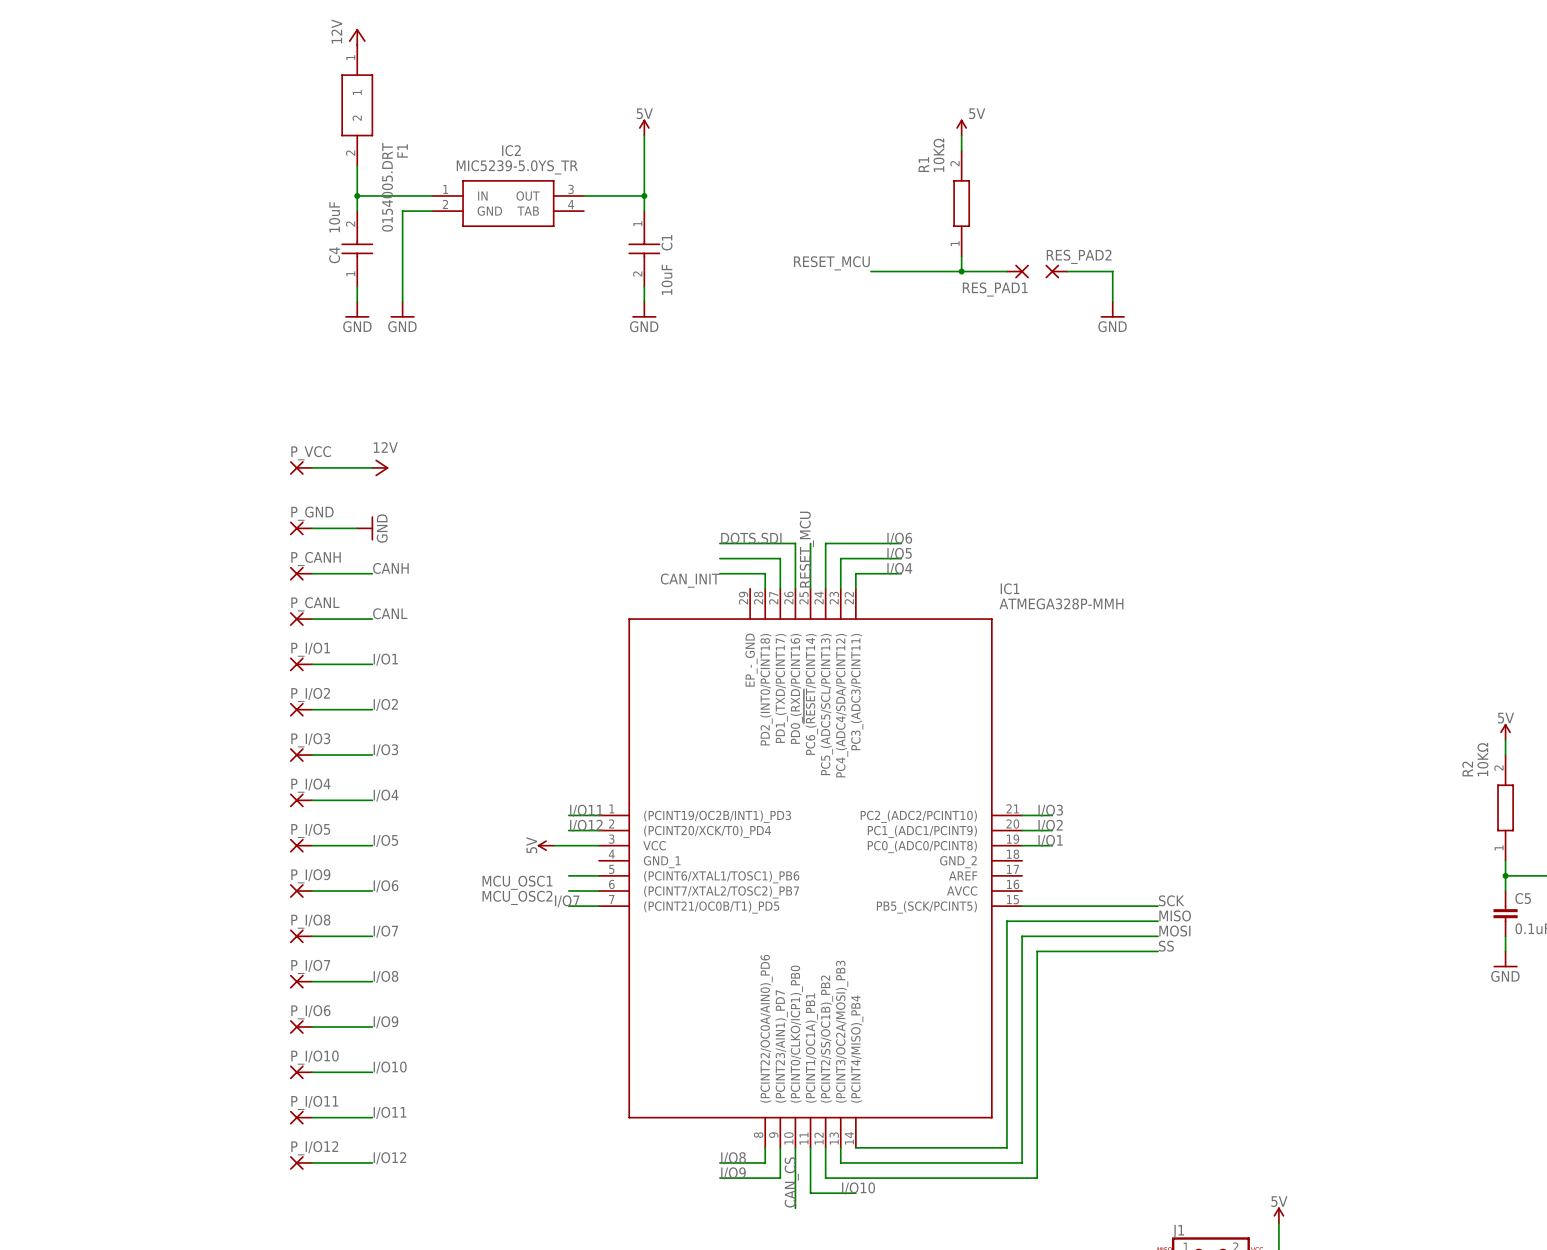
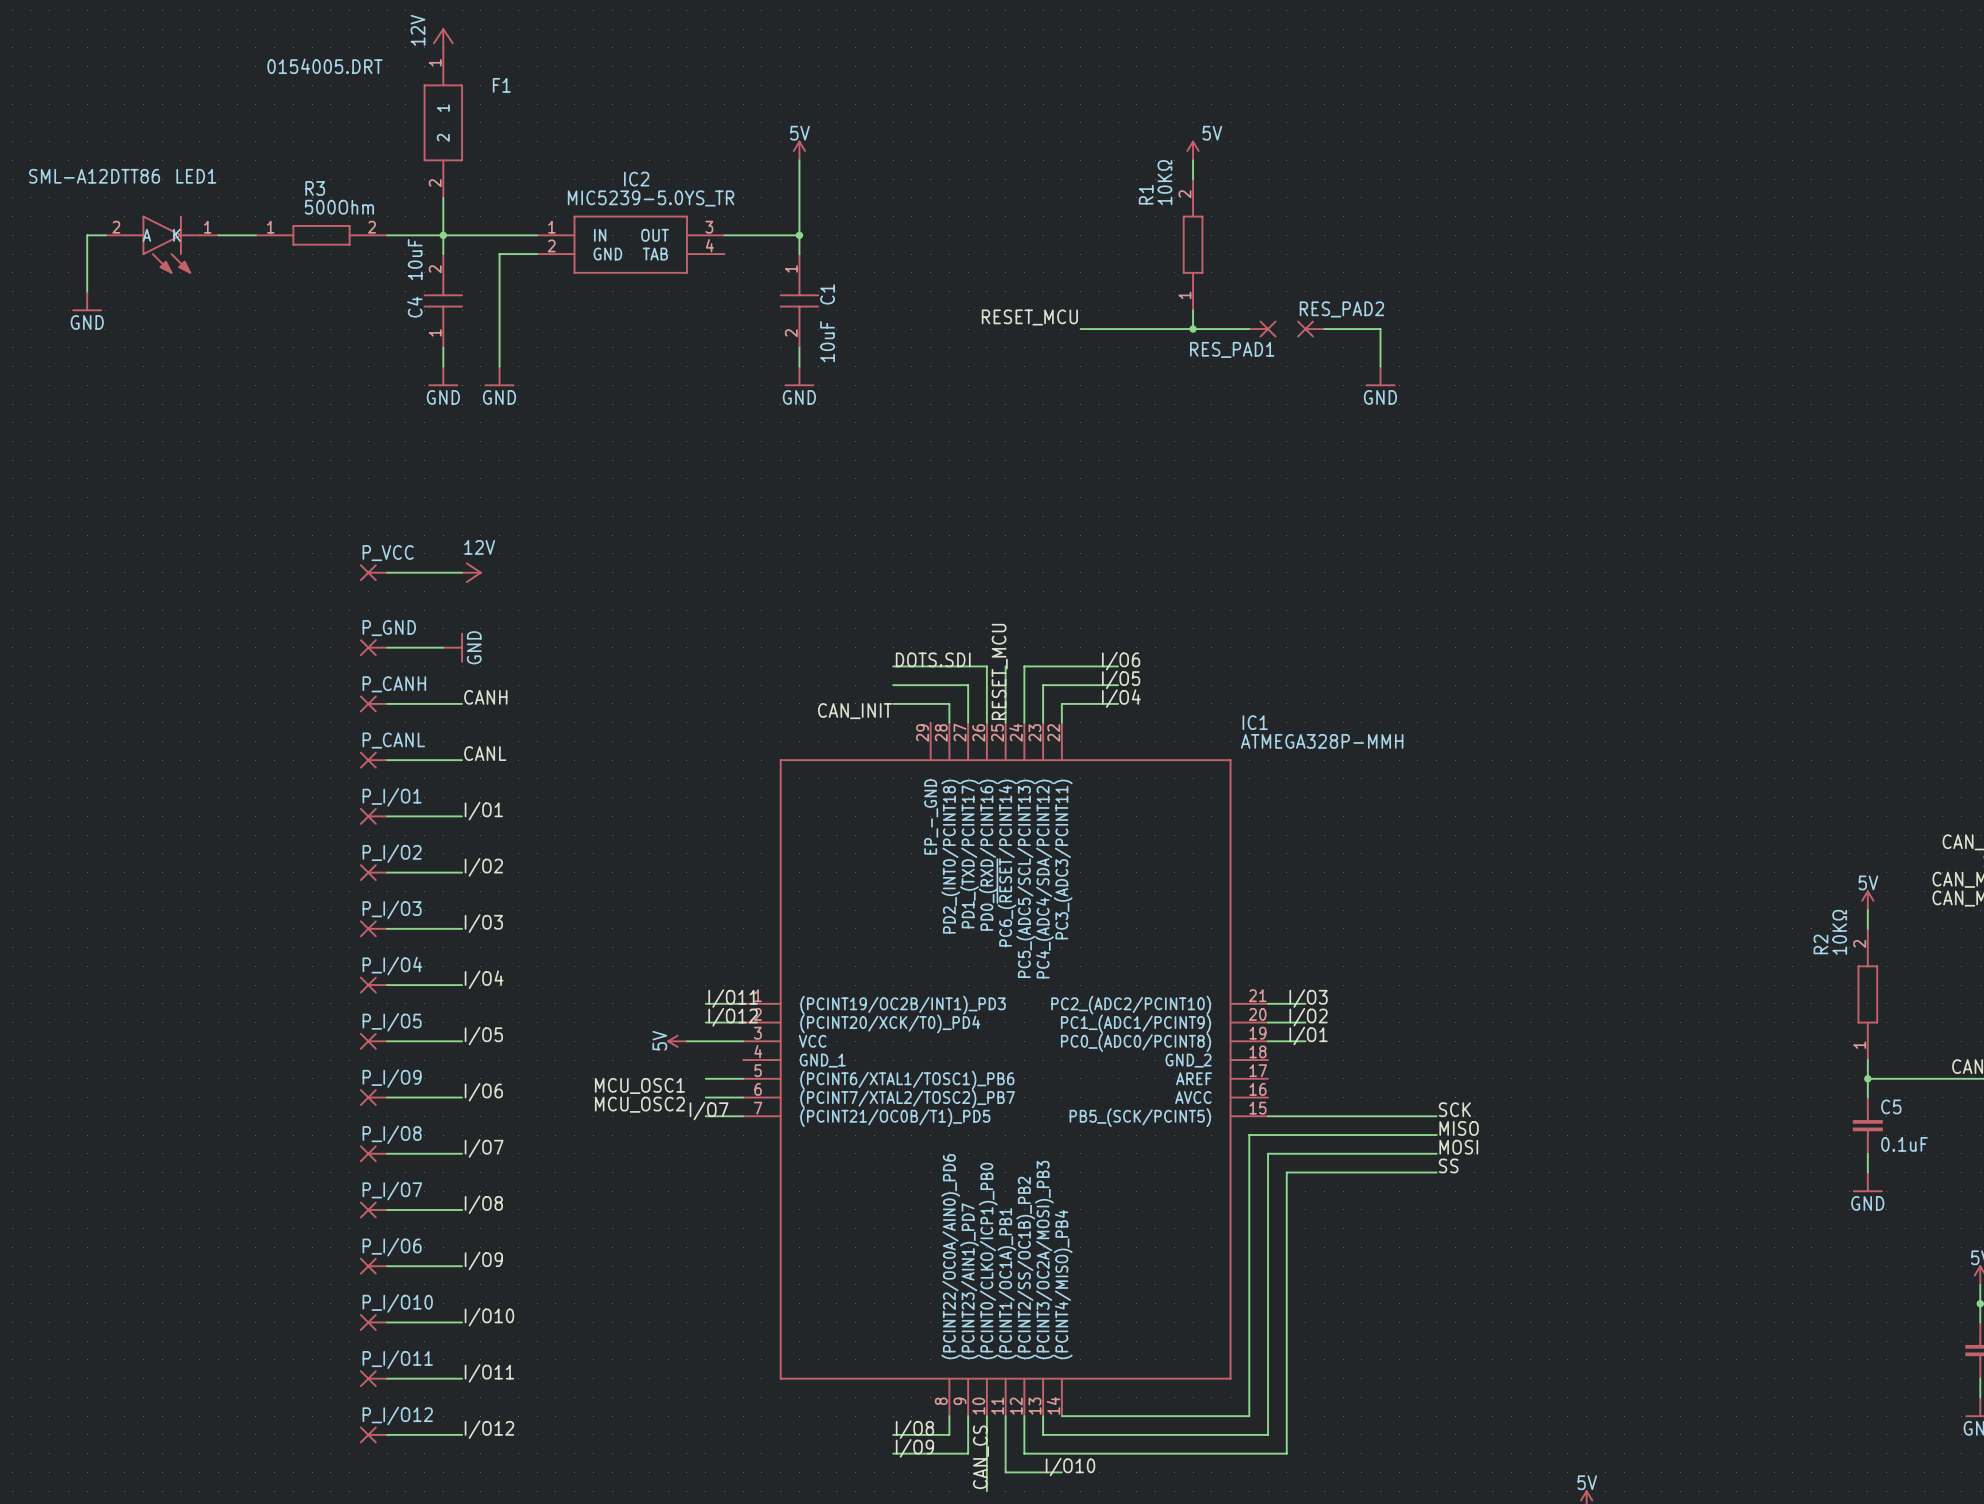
F1 name rotation: 0° (402, 150) -> 90° clockwise (501, 85)
F1 name position: F1 (402, 150) -> F1 (501, 85)
F1 value rotation: 0° (387, 187) -> 90° clockwise (324, 66)
F1 value position: 0154005.DRT (387, 187) -> 0154005.DRT (324, 66)
wire: none -> (105, 235) (87, 235) (87, 291)
wire: none -> (218, 235) (255, 235)
R3: none -> 500Ohm (321, 235)
wire: none -> (387, 235) (443, 235)
LED1: none -> SML-A12DTT86 (162, 244)
power symbol: none -> GND (87, 301)

